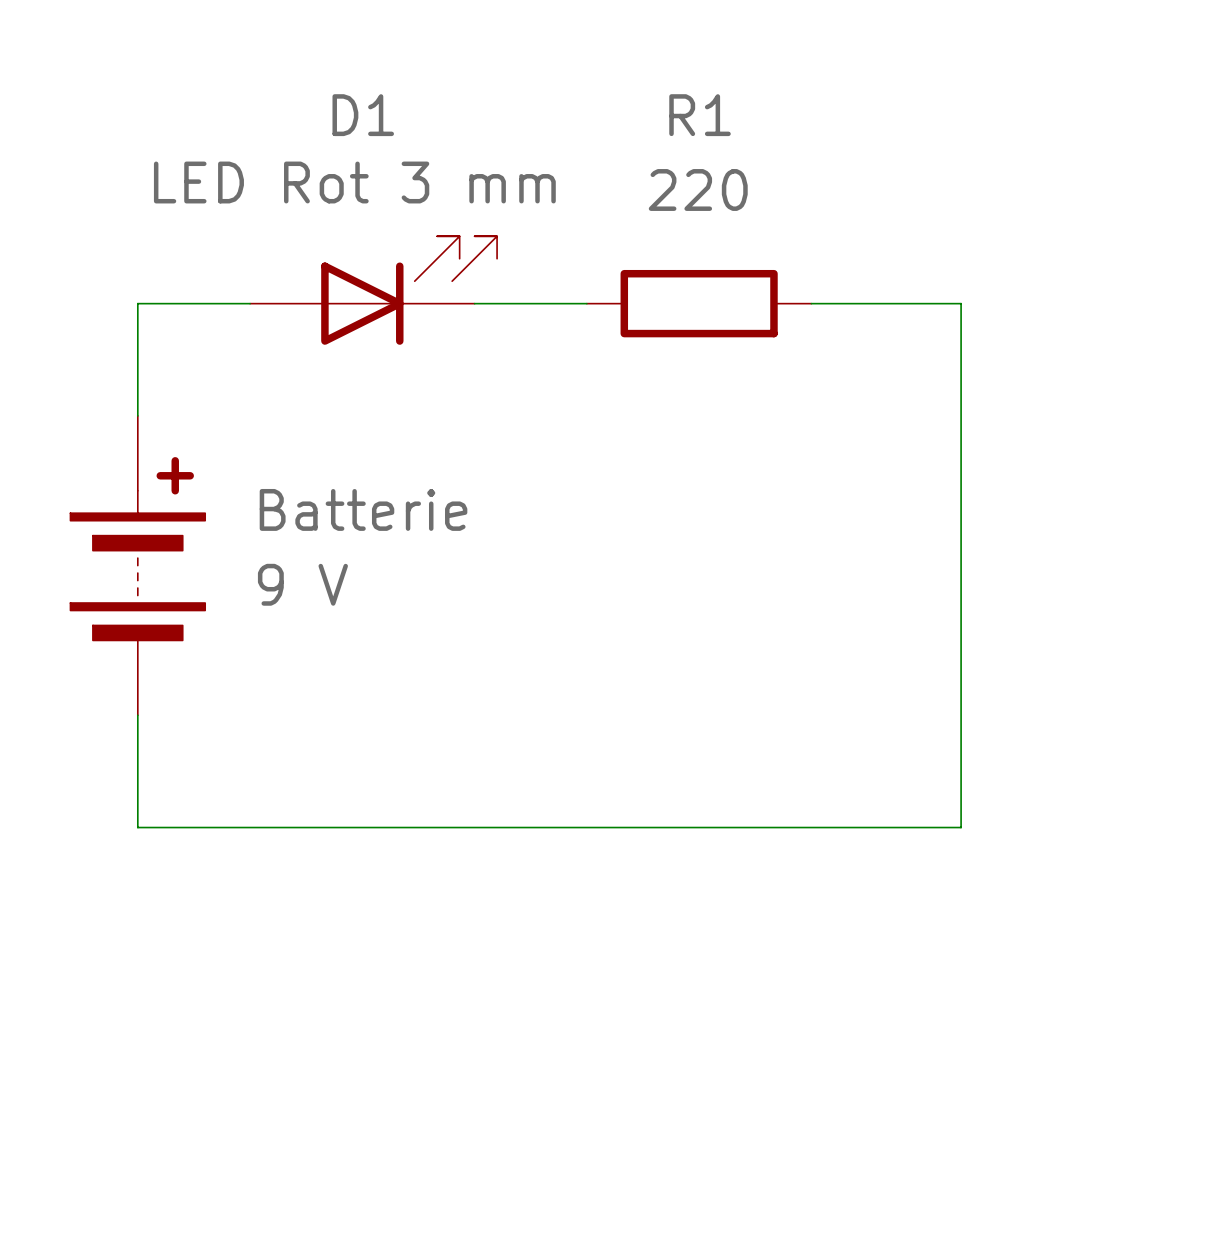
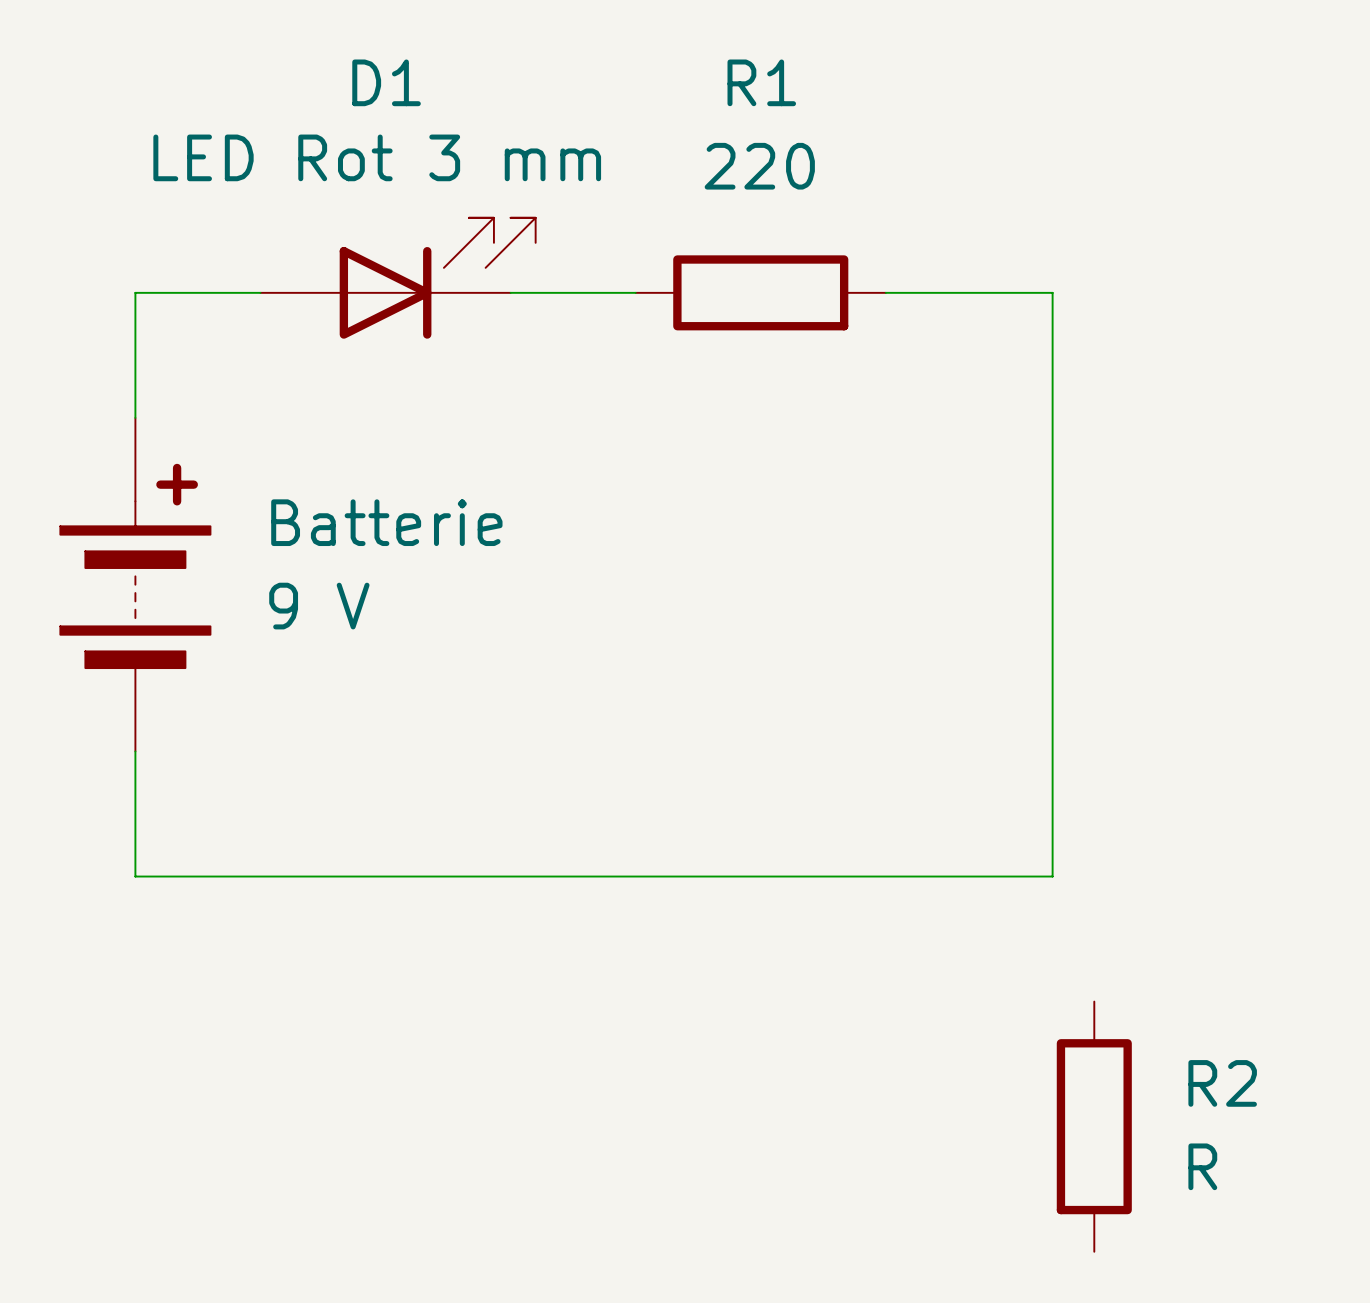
R2: none -> R (1094, 1126)

